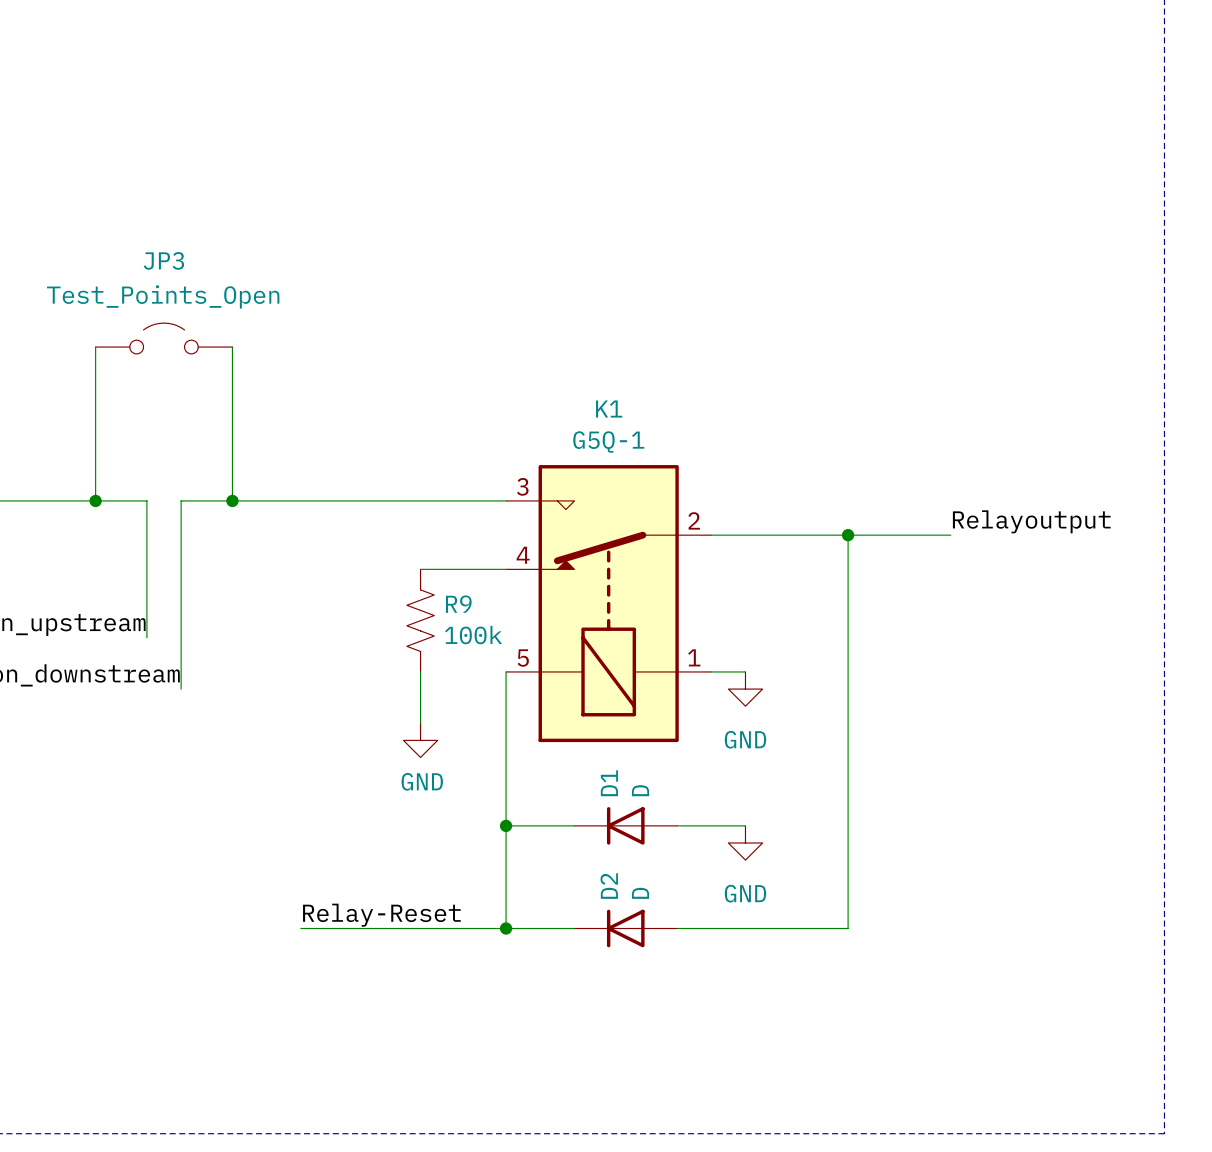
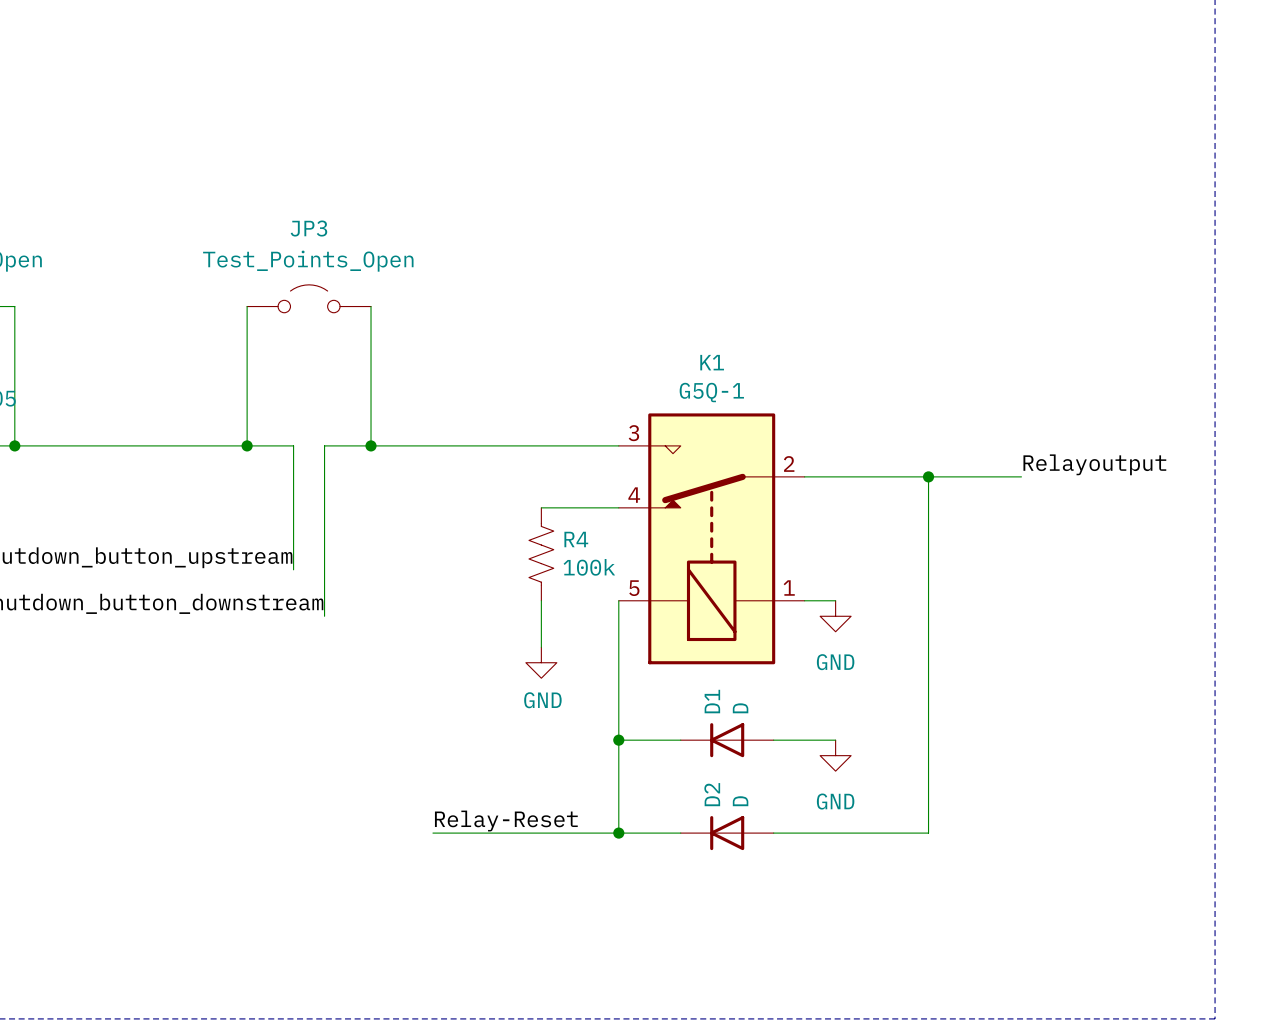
R9 name: R9 (458, 604) -> R4 (576, 539)

